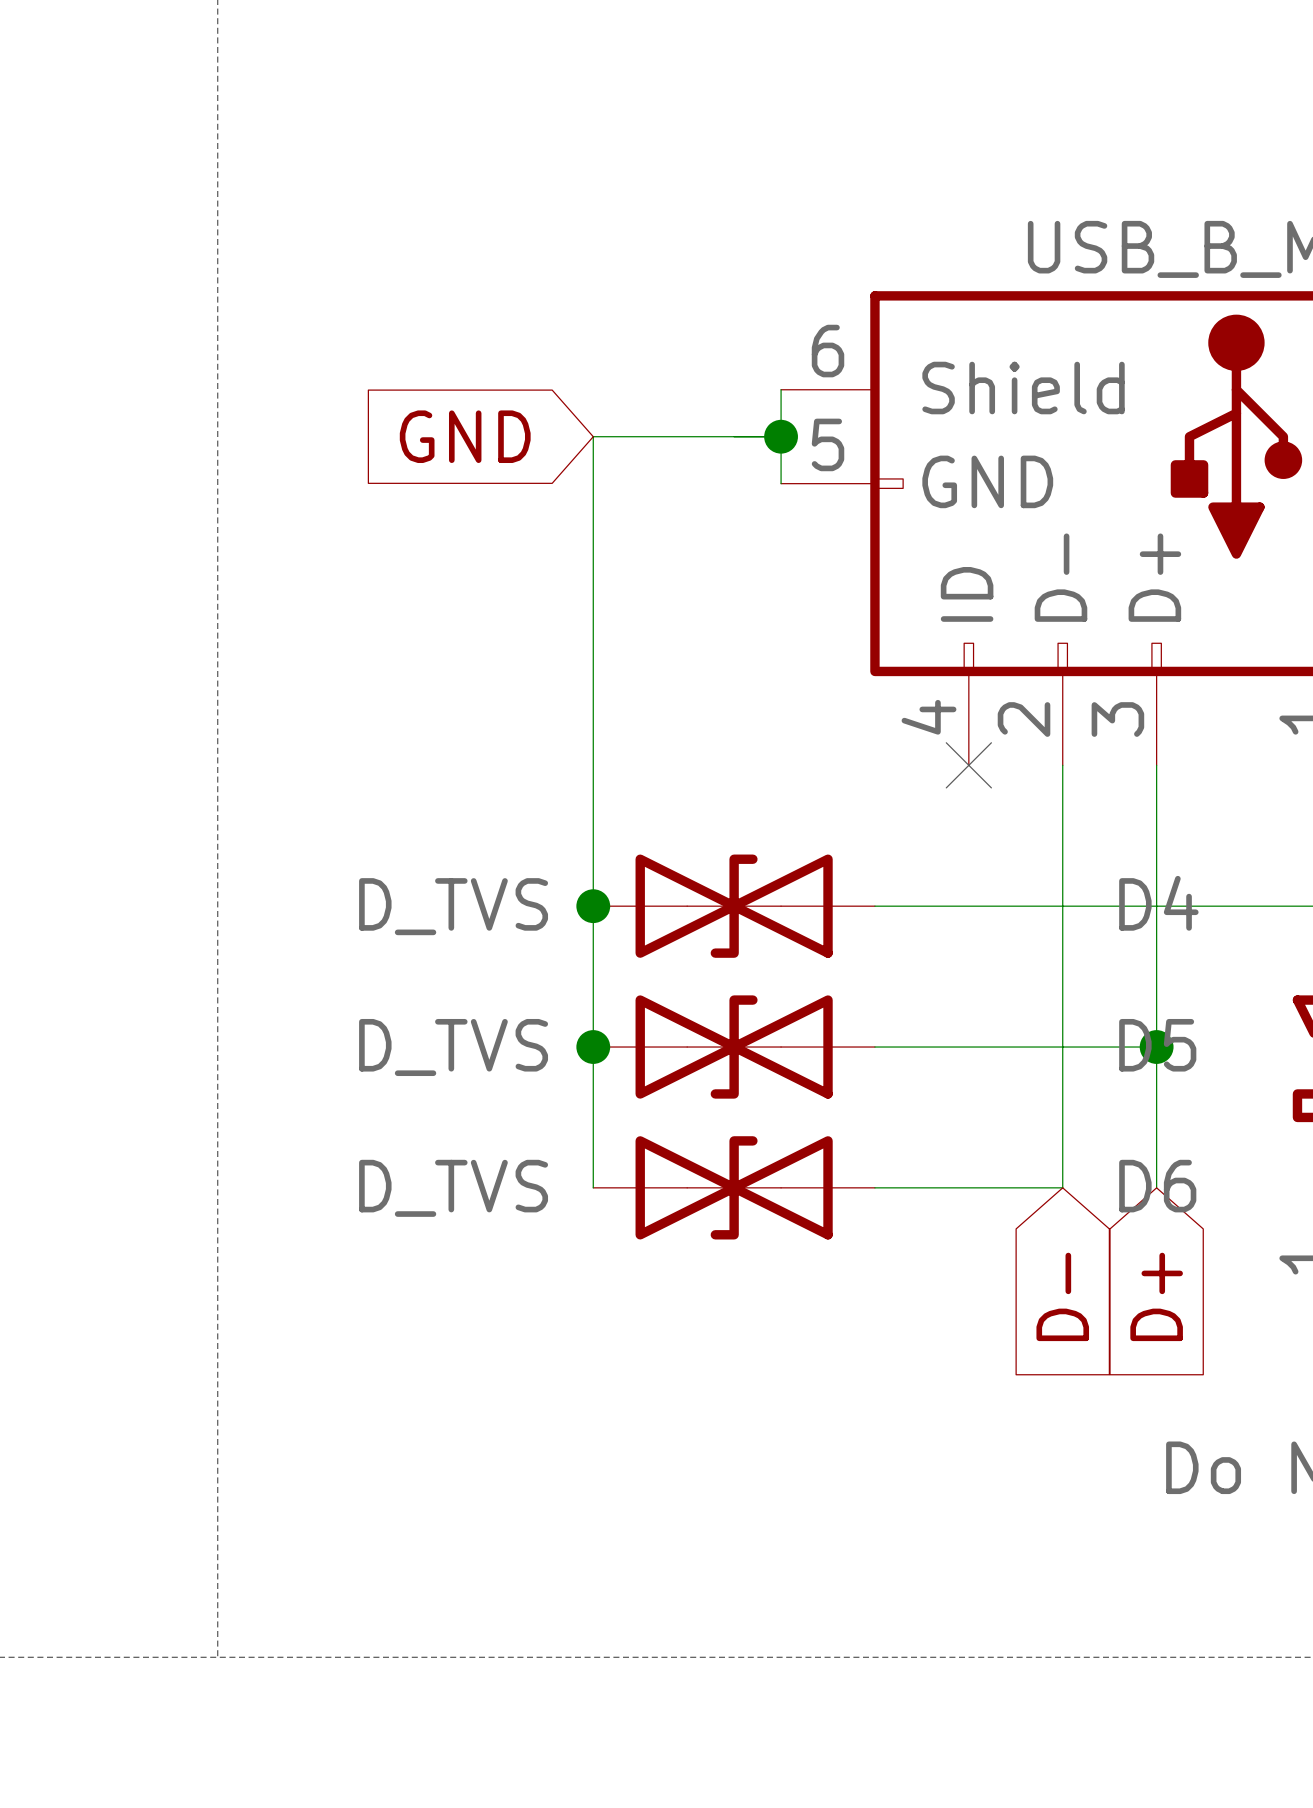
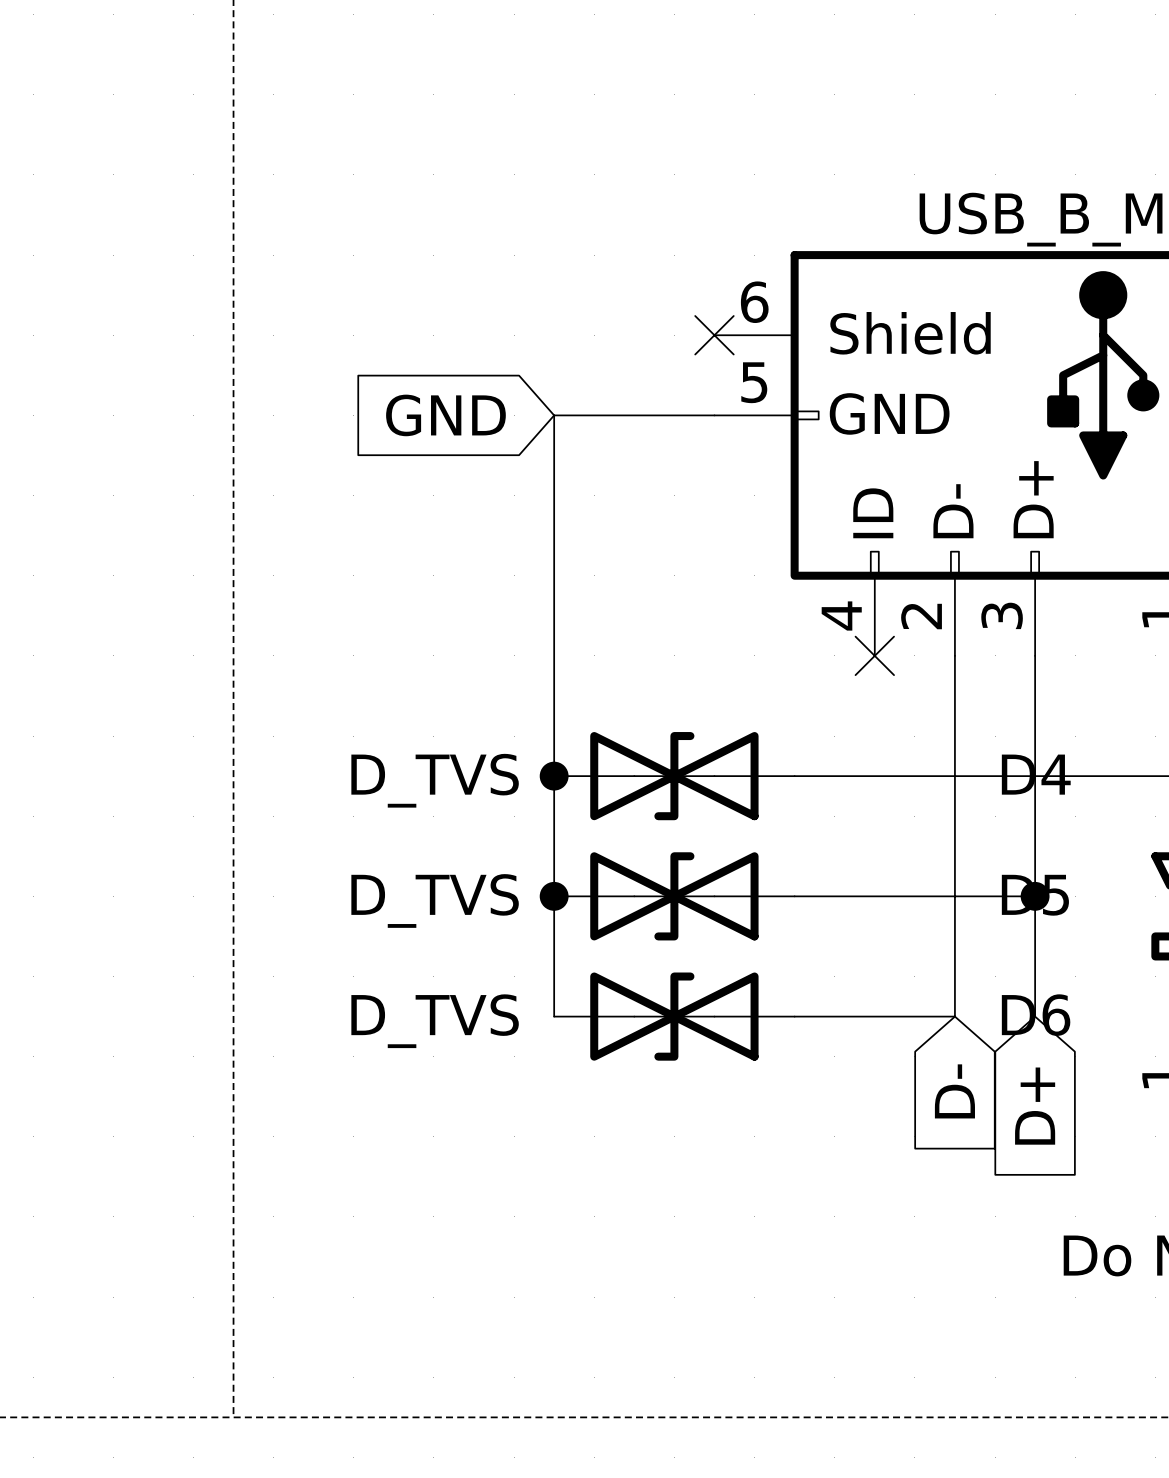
wire: (781, 389) (781, 483) -> none
no-connect mark: none -> (714, 335)
global label position: GND (465, 436) -> GND (445, 415)
wire: (781, 436) (593, 436) (593, 483) -> (714, 415) (554, 415)
junction: (781, 436) -> none

